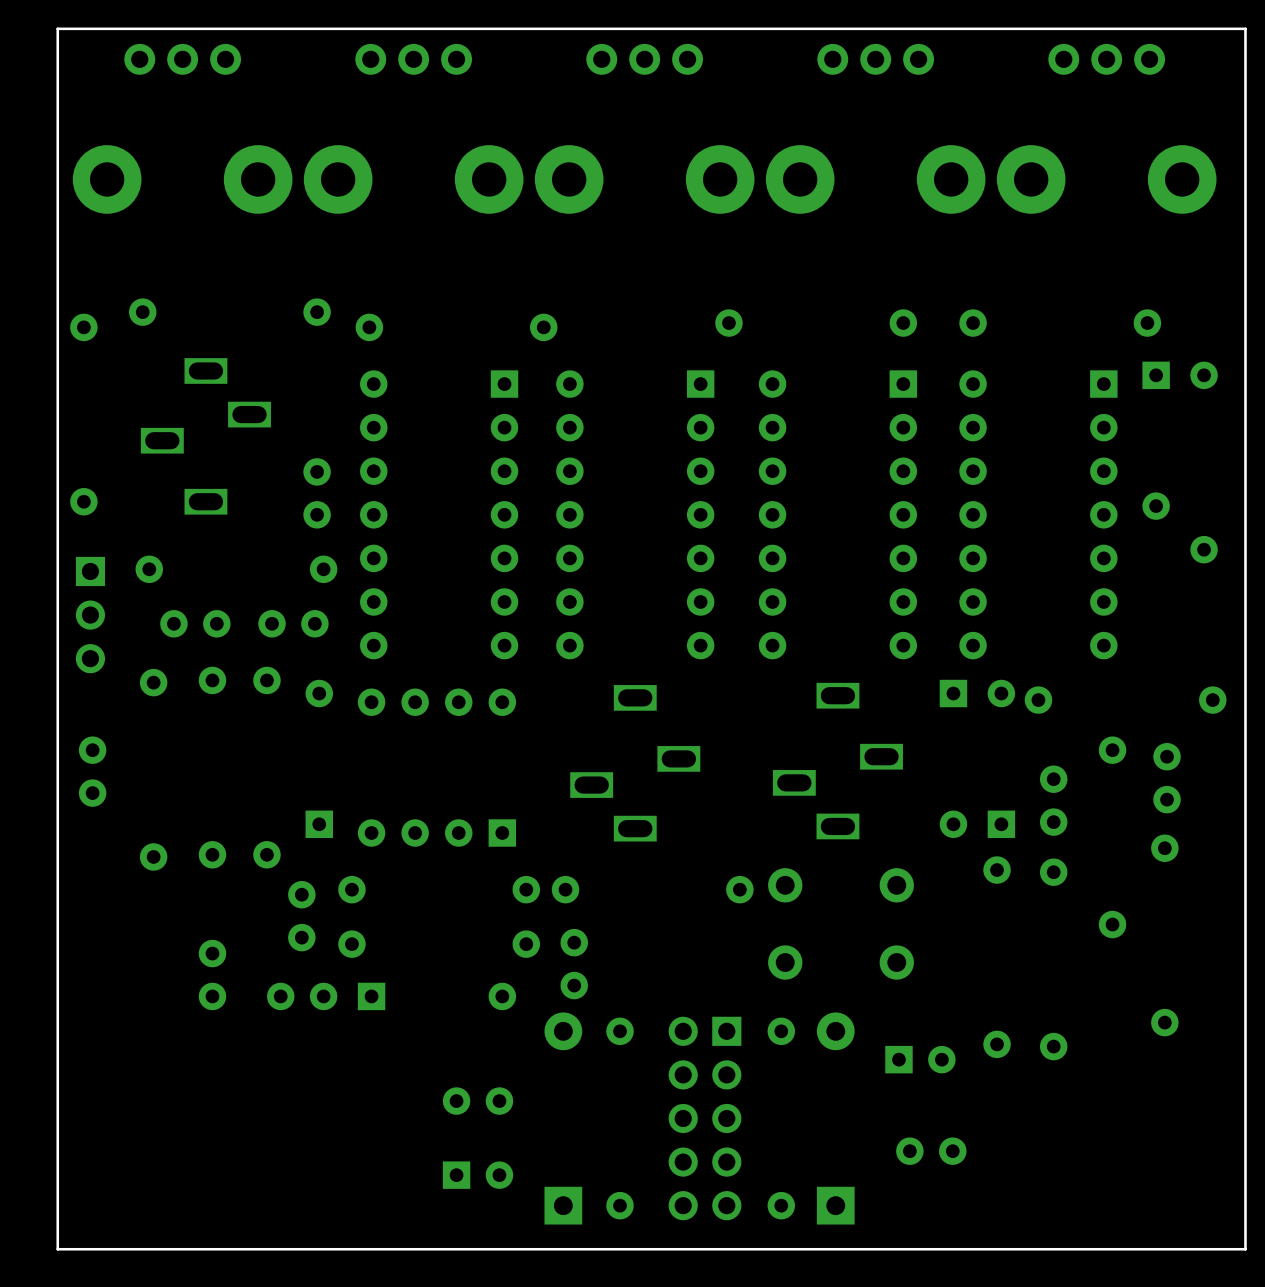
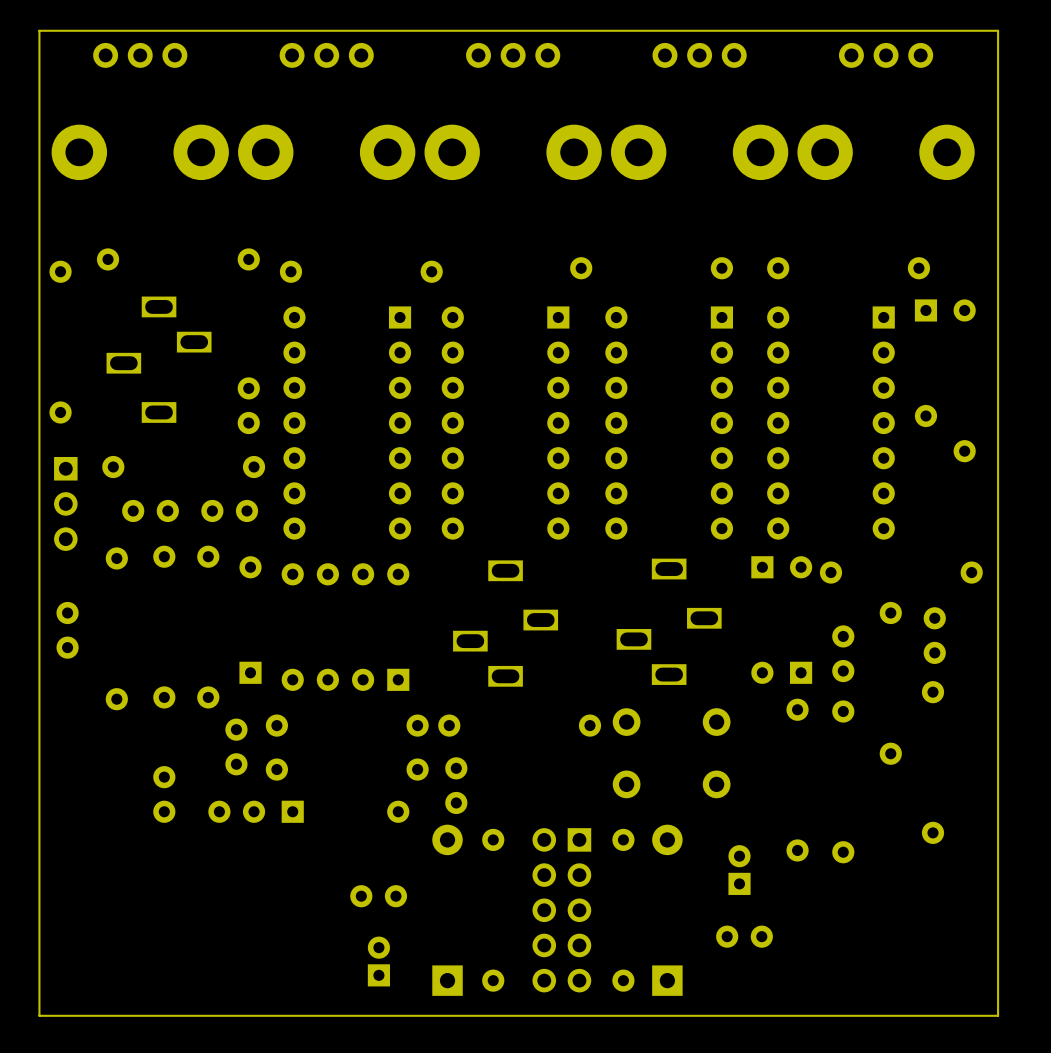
part footprint: [885, 1045, 956, 1074] -> [728, 845, 751, 895]
part footprint: [442, 1161, 514, 1189] -> [367, 936, 391, 987]

